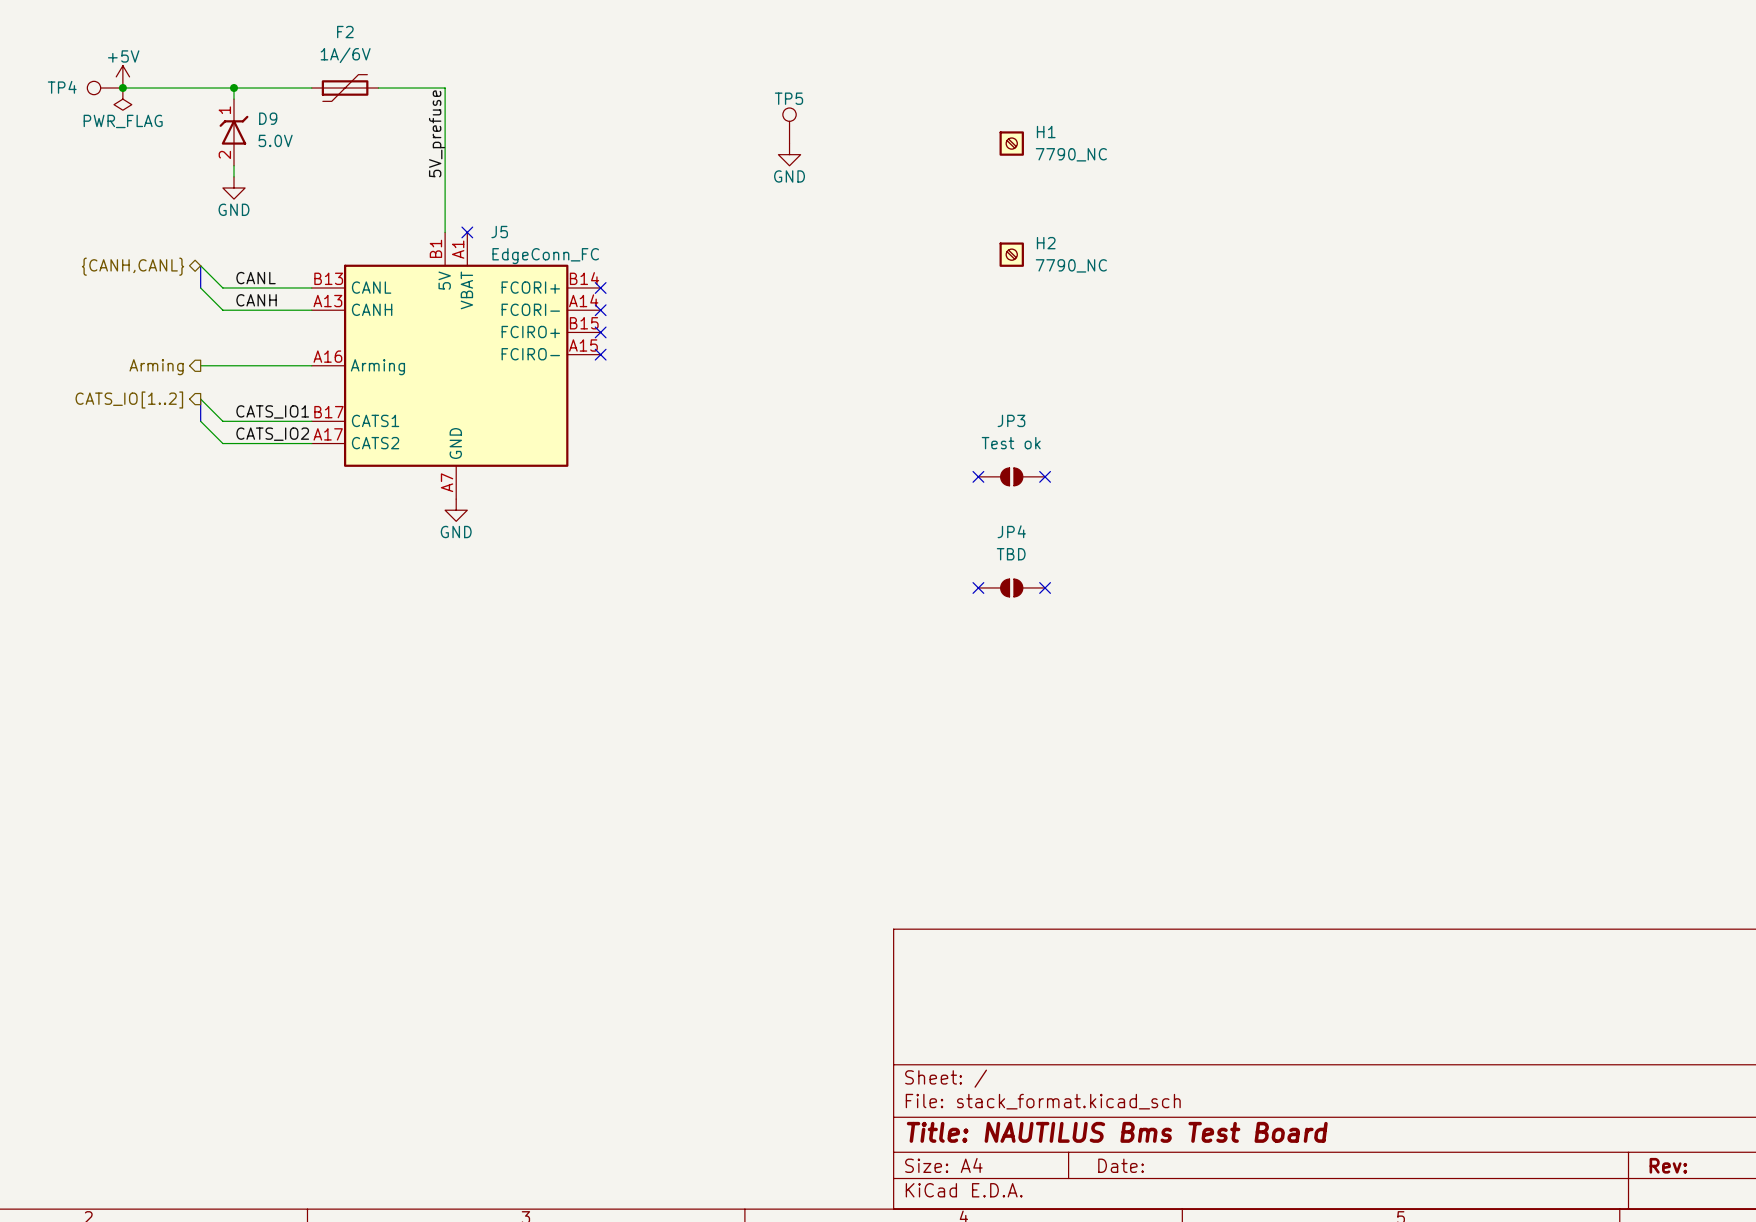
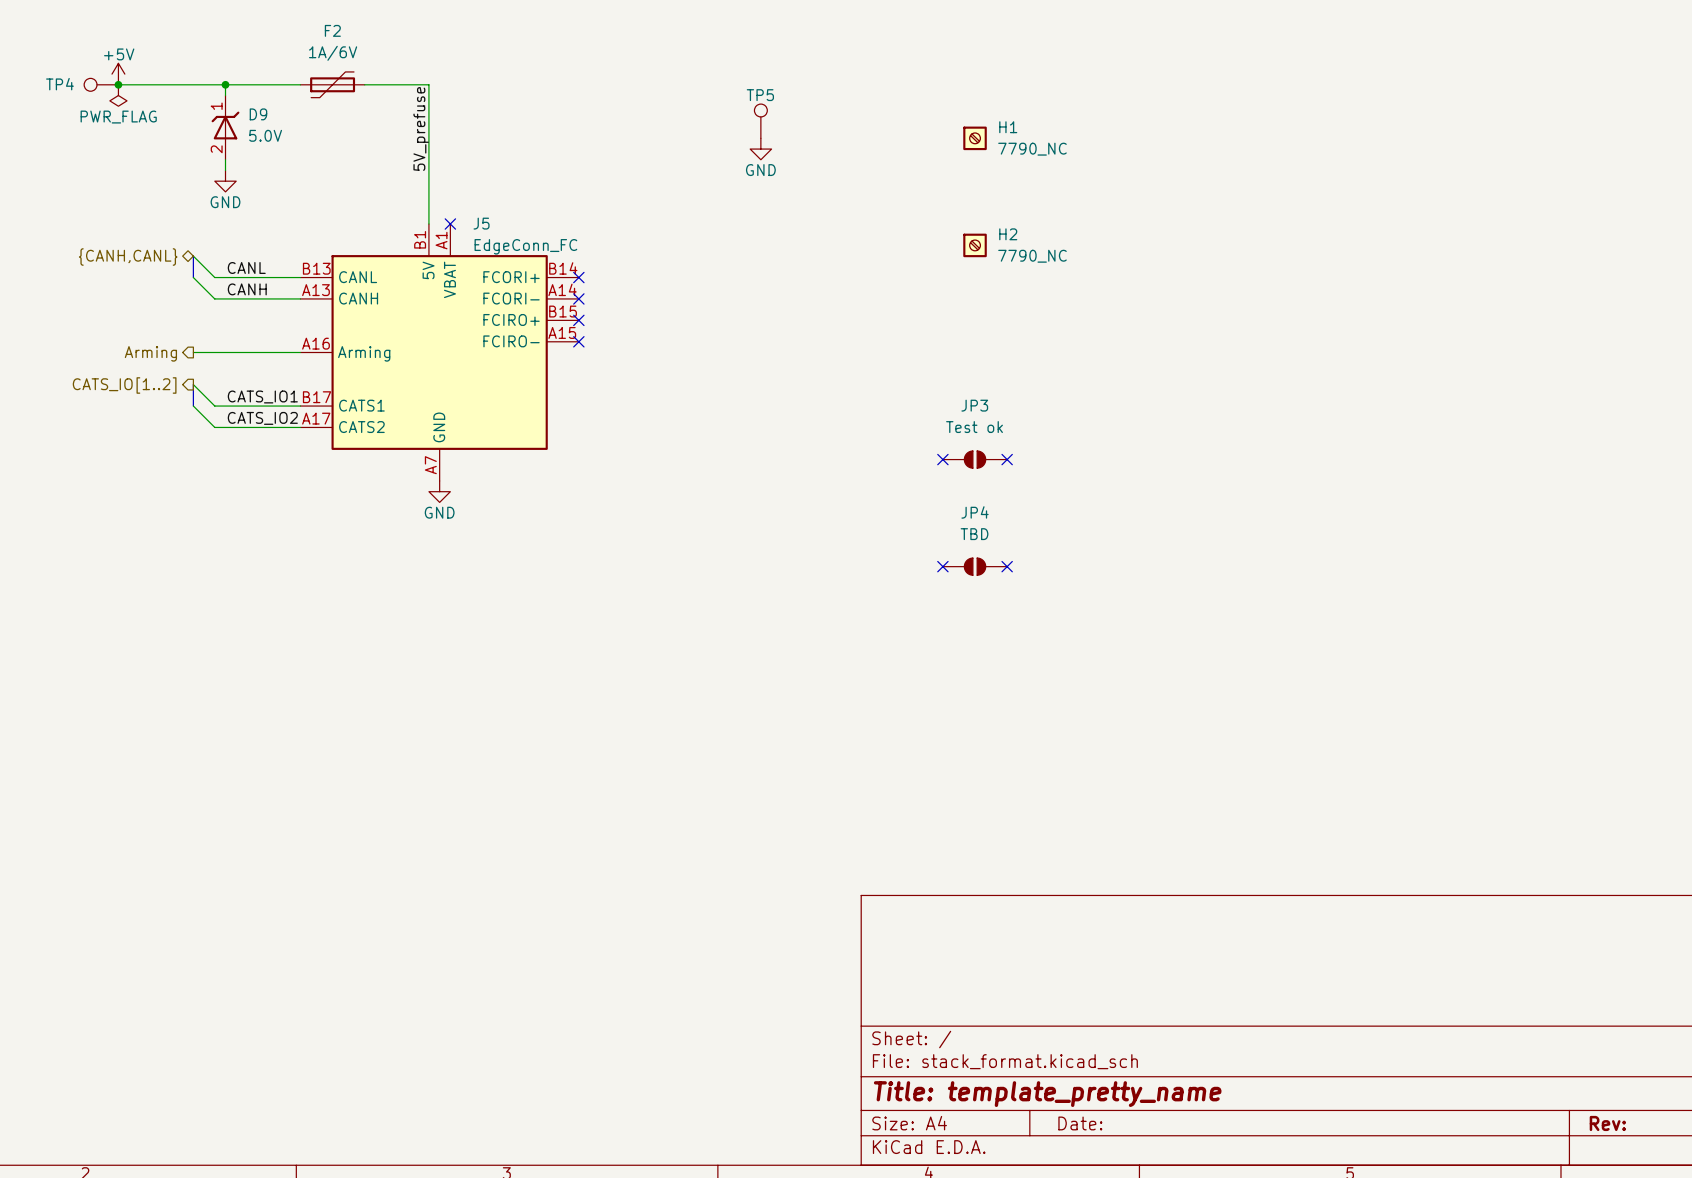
title block: Title: NAUTILUS Bms Test Board (1117, 1132) -> Title: template_pretty_name (1047, 1094)

